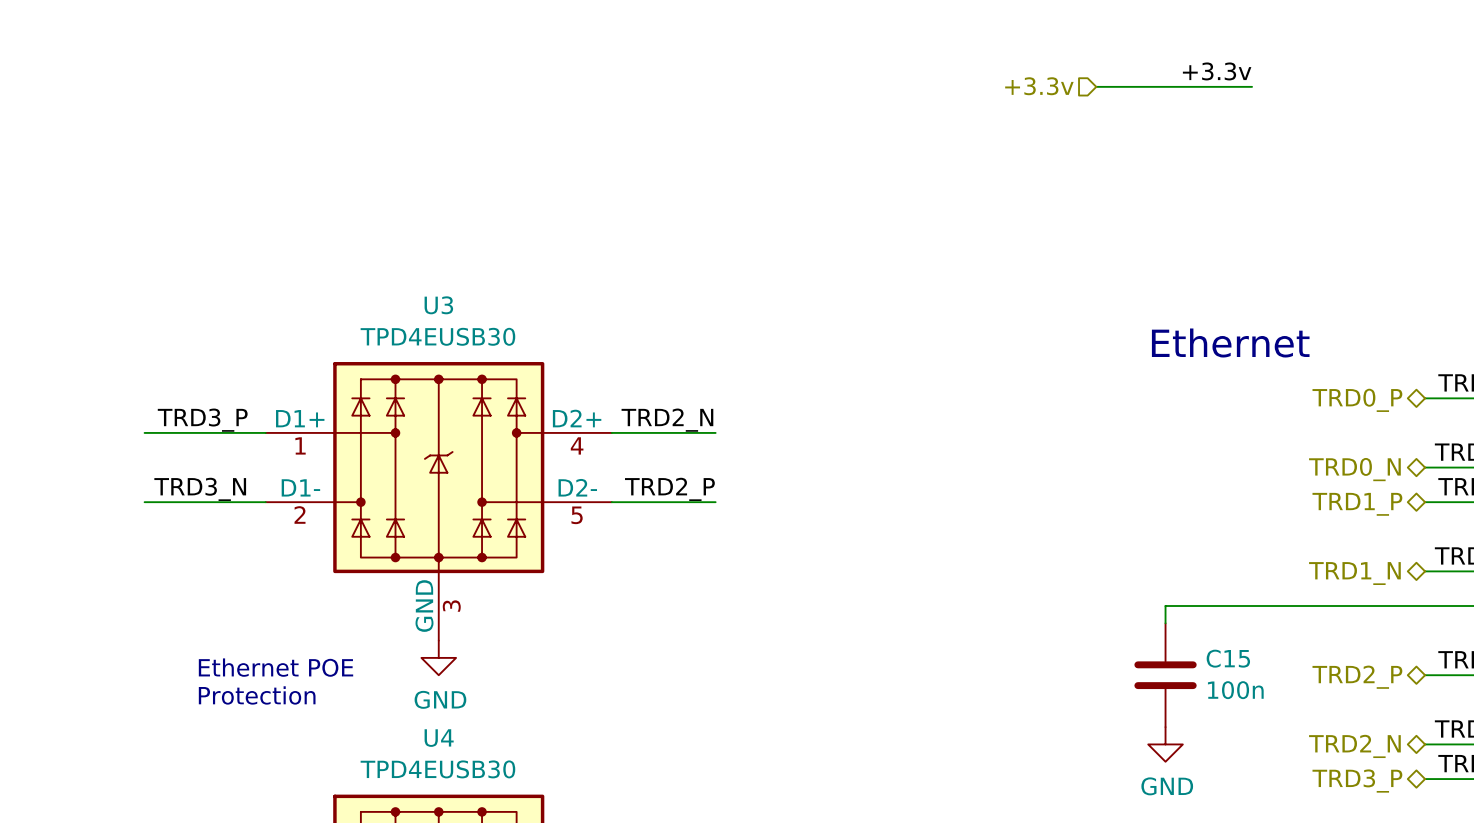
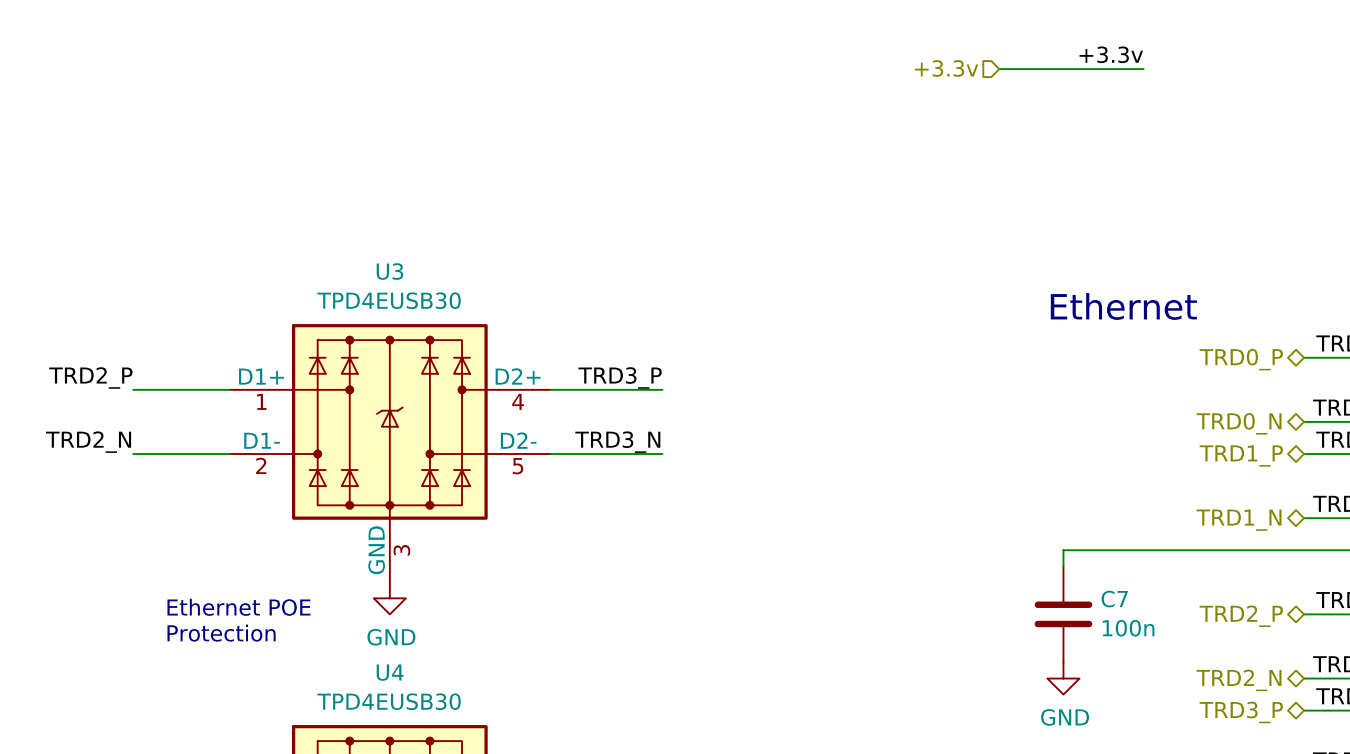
label: TRD3_P (202, 420) -> TRD2_P (90, 377)
label: TRD2_N (667, 420) -> TRD3_P (620, 377)
wire: (144, 432) (161, 432) -> none
wire: none -> (646, 389) (662, 389)
label: TRD3_N (200, 489) -> TRD2_N (88, 442)
label: TRD2_P (669, 489) -> TRD3_N (617, 442)
wire: (144, 502) (161, 502) -> none
wire: none -> (646, 454) (662, 454)
C15 name: C15 (1228, 658) -> C7 (1114, 599)

